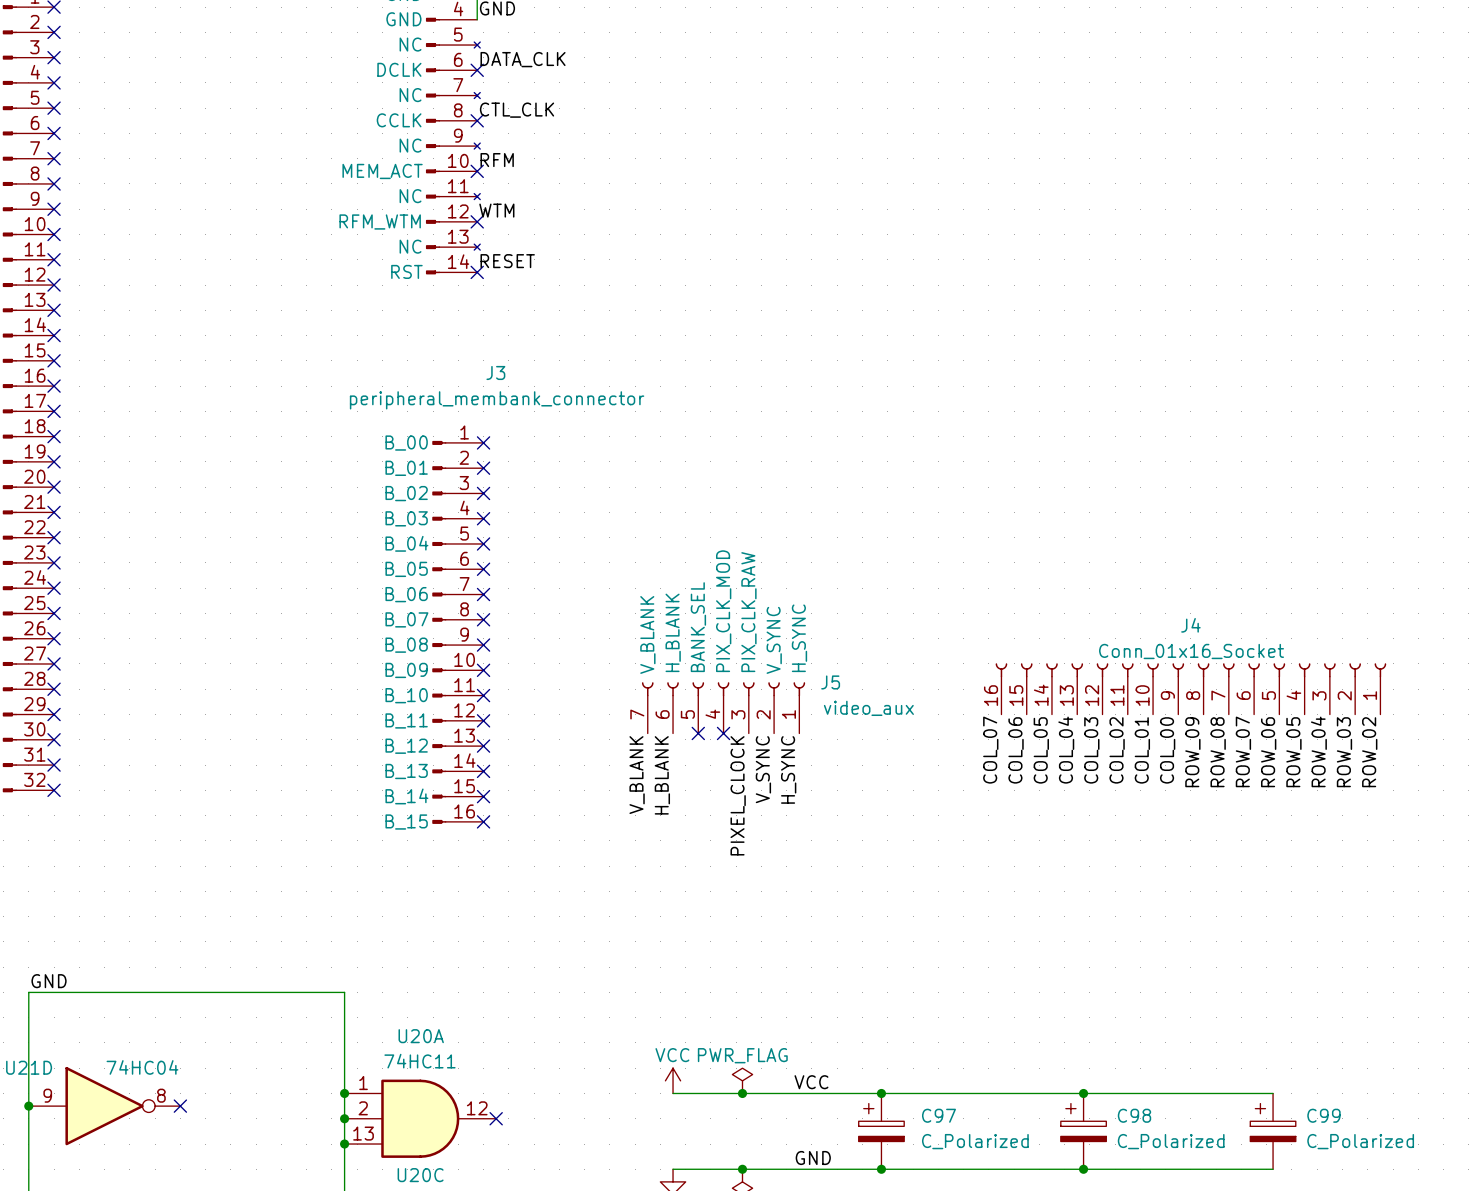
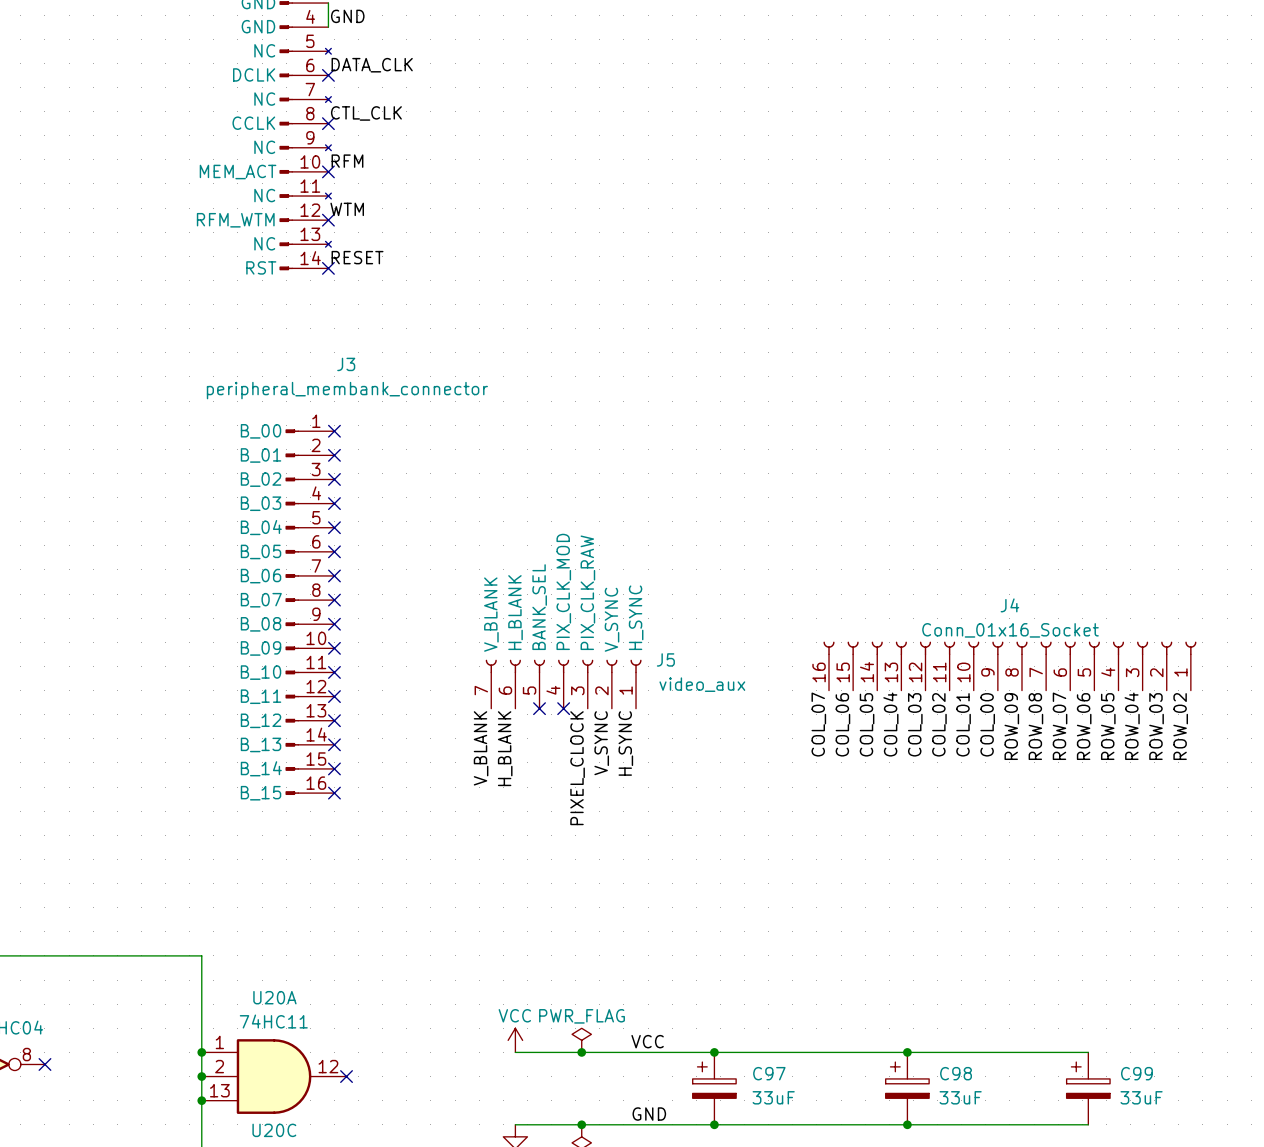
C97 value: C_Polarized (975, 1141) -> 33uF (773, 1097)
C98 value: C_Polarized (1171, 1141) -> 33uF (960, 1097)
C99 value: C_Polarized (1360, 1141) -> 33uF (1141, 1097)

